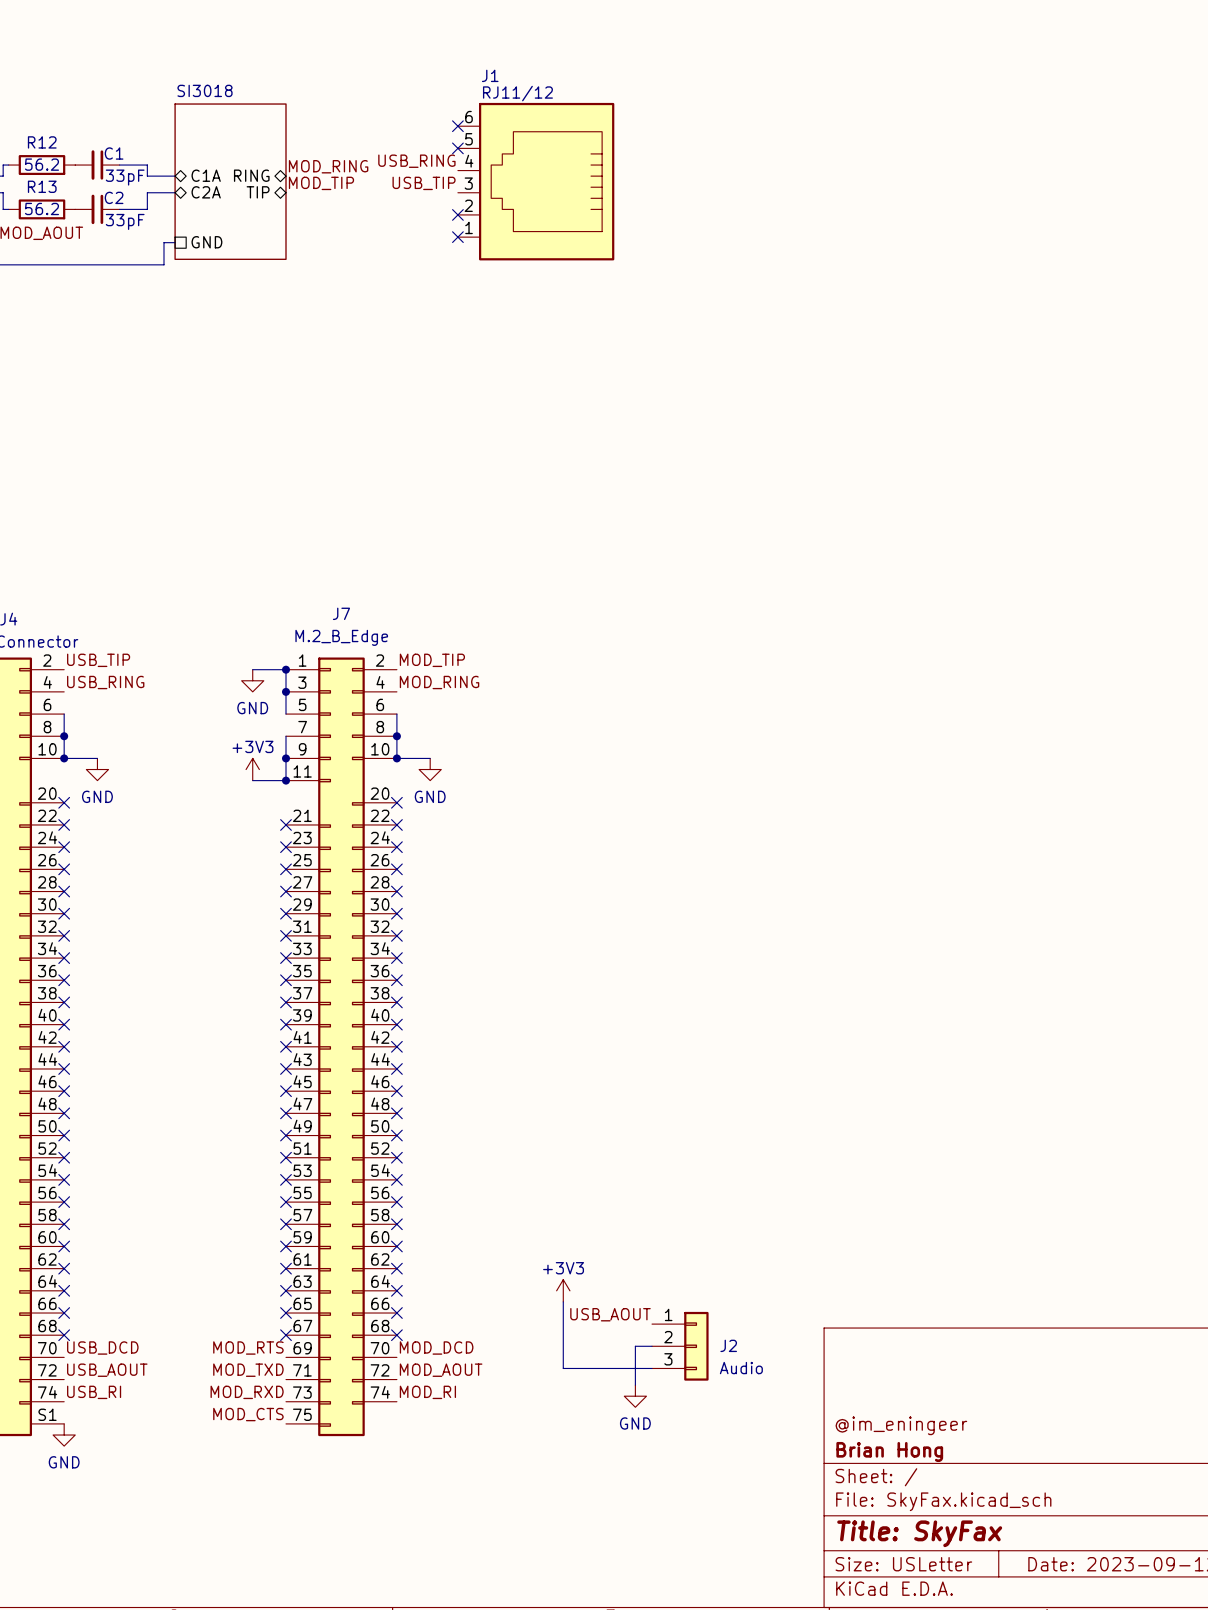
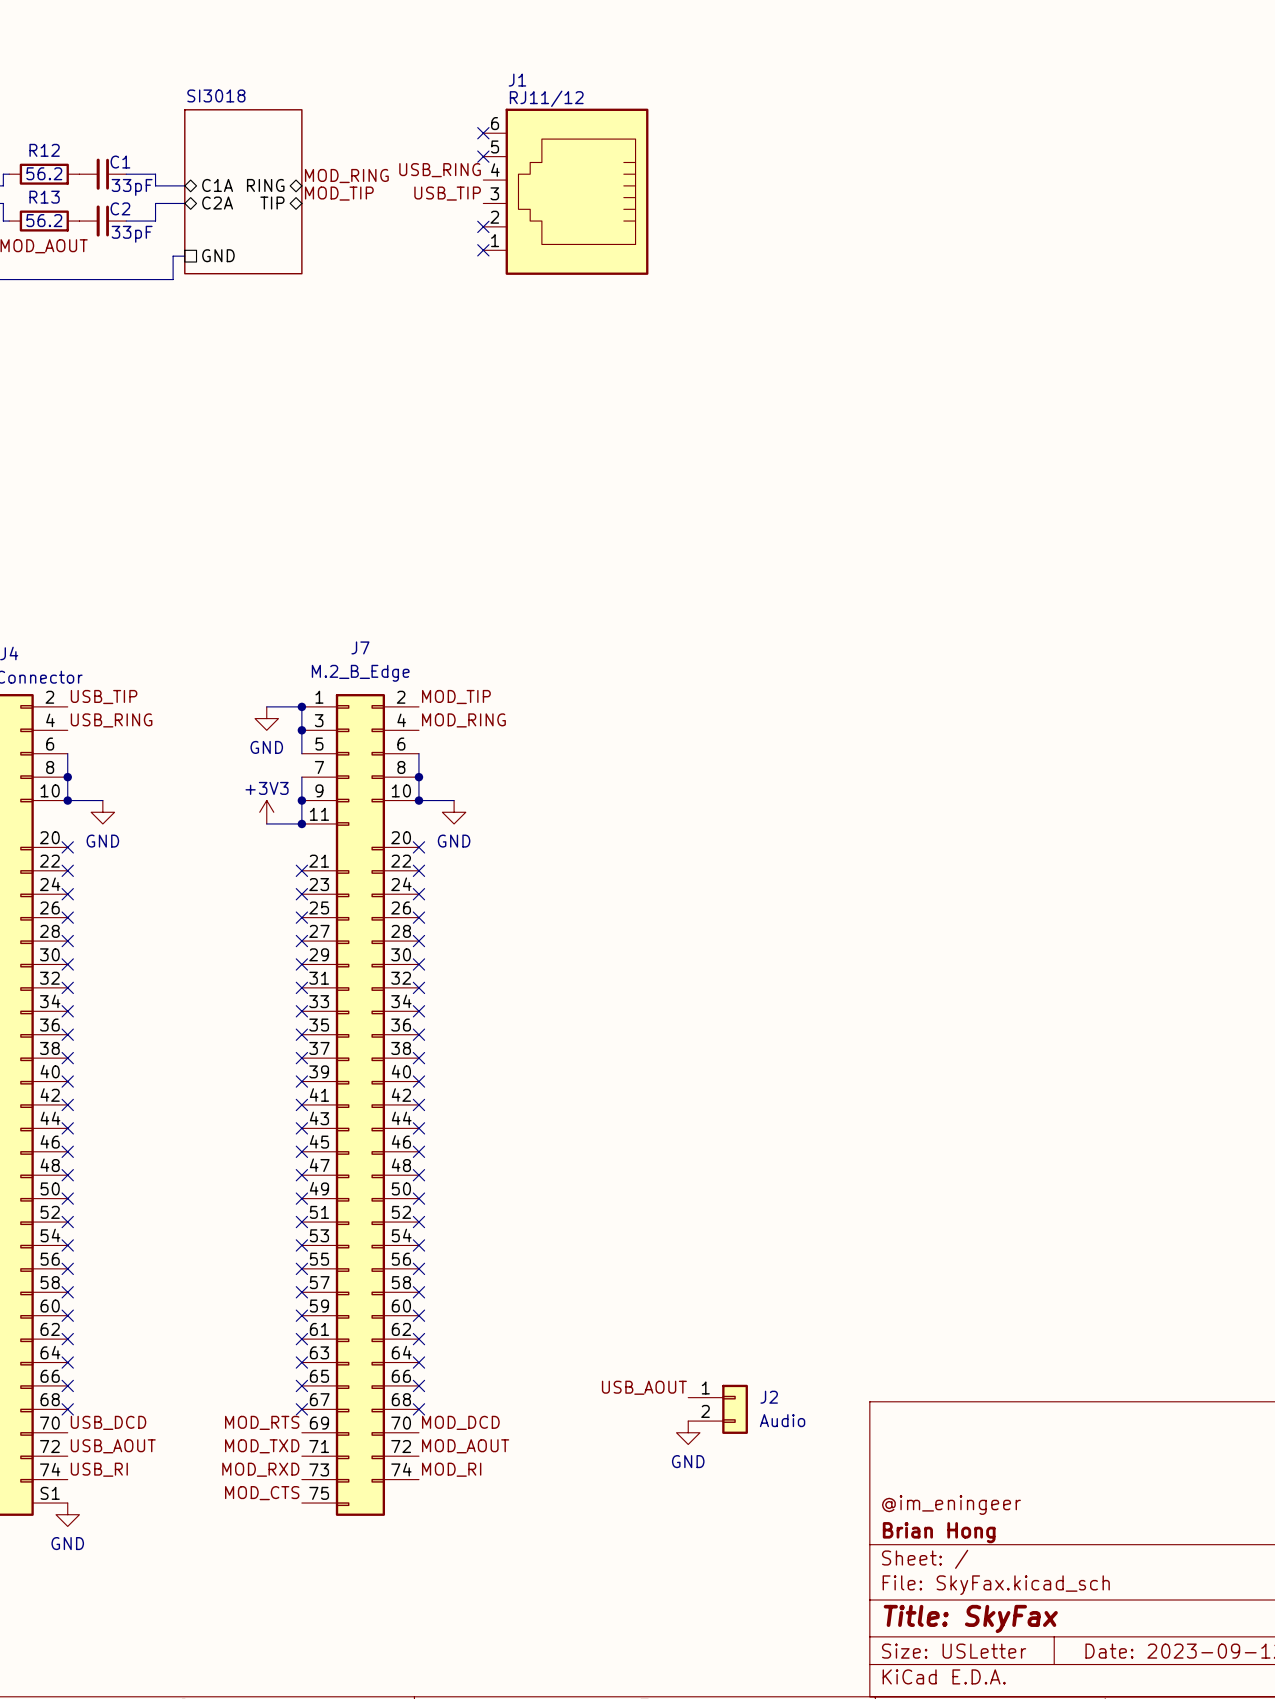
power symbol: +3V3 (563, 1290) -> none
wire: (563, 1301) (563, 1368) (652, 1368) -> none
J2 symbol: [652, 1311, 709, 1381] -> [688, 1384, 748, 1434]
wire: (652, 1346) (635, 1346) (635, 1385) -> none
power symbol position: GND (635, 1396) -> GND (688, 1432)

